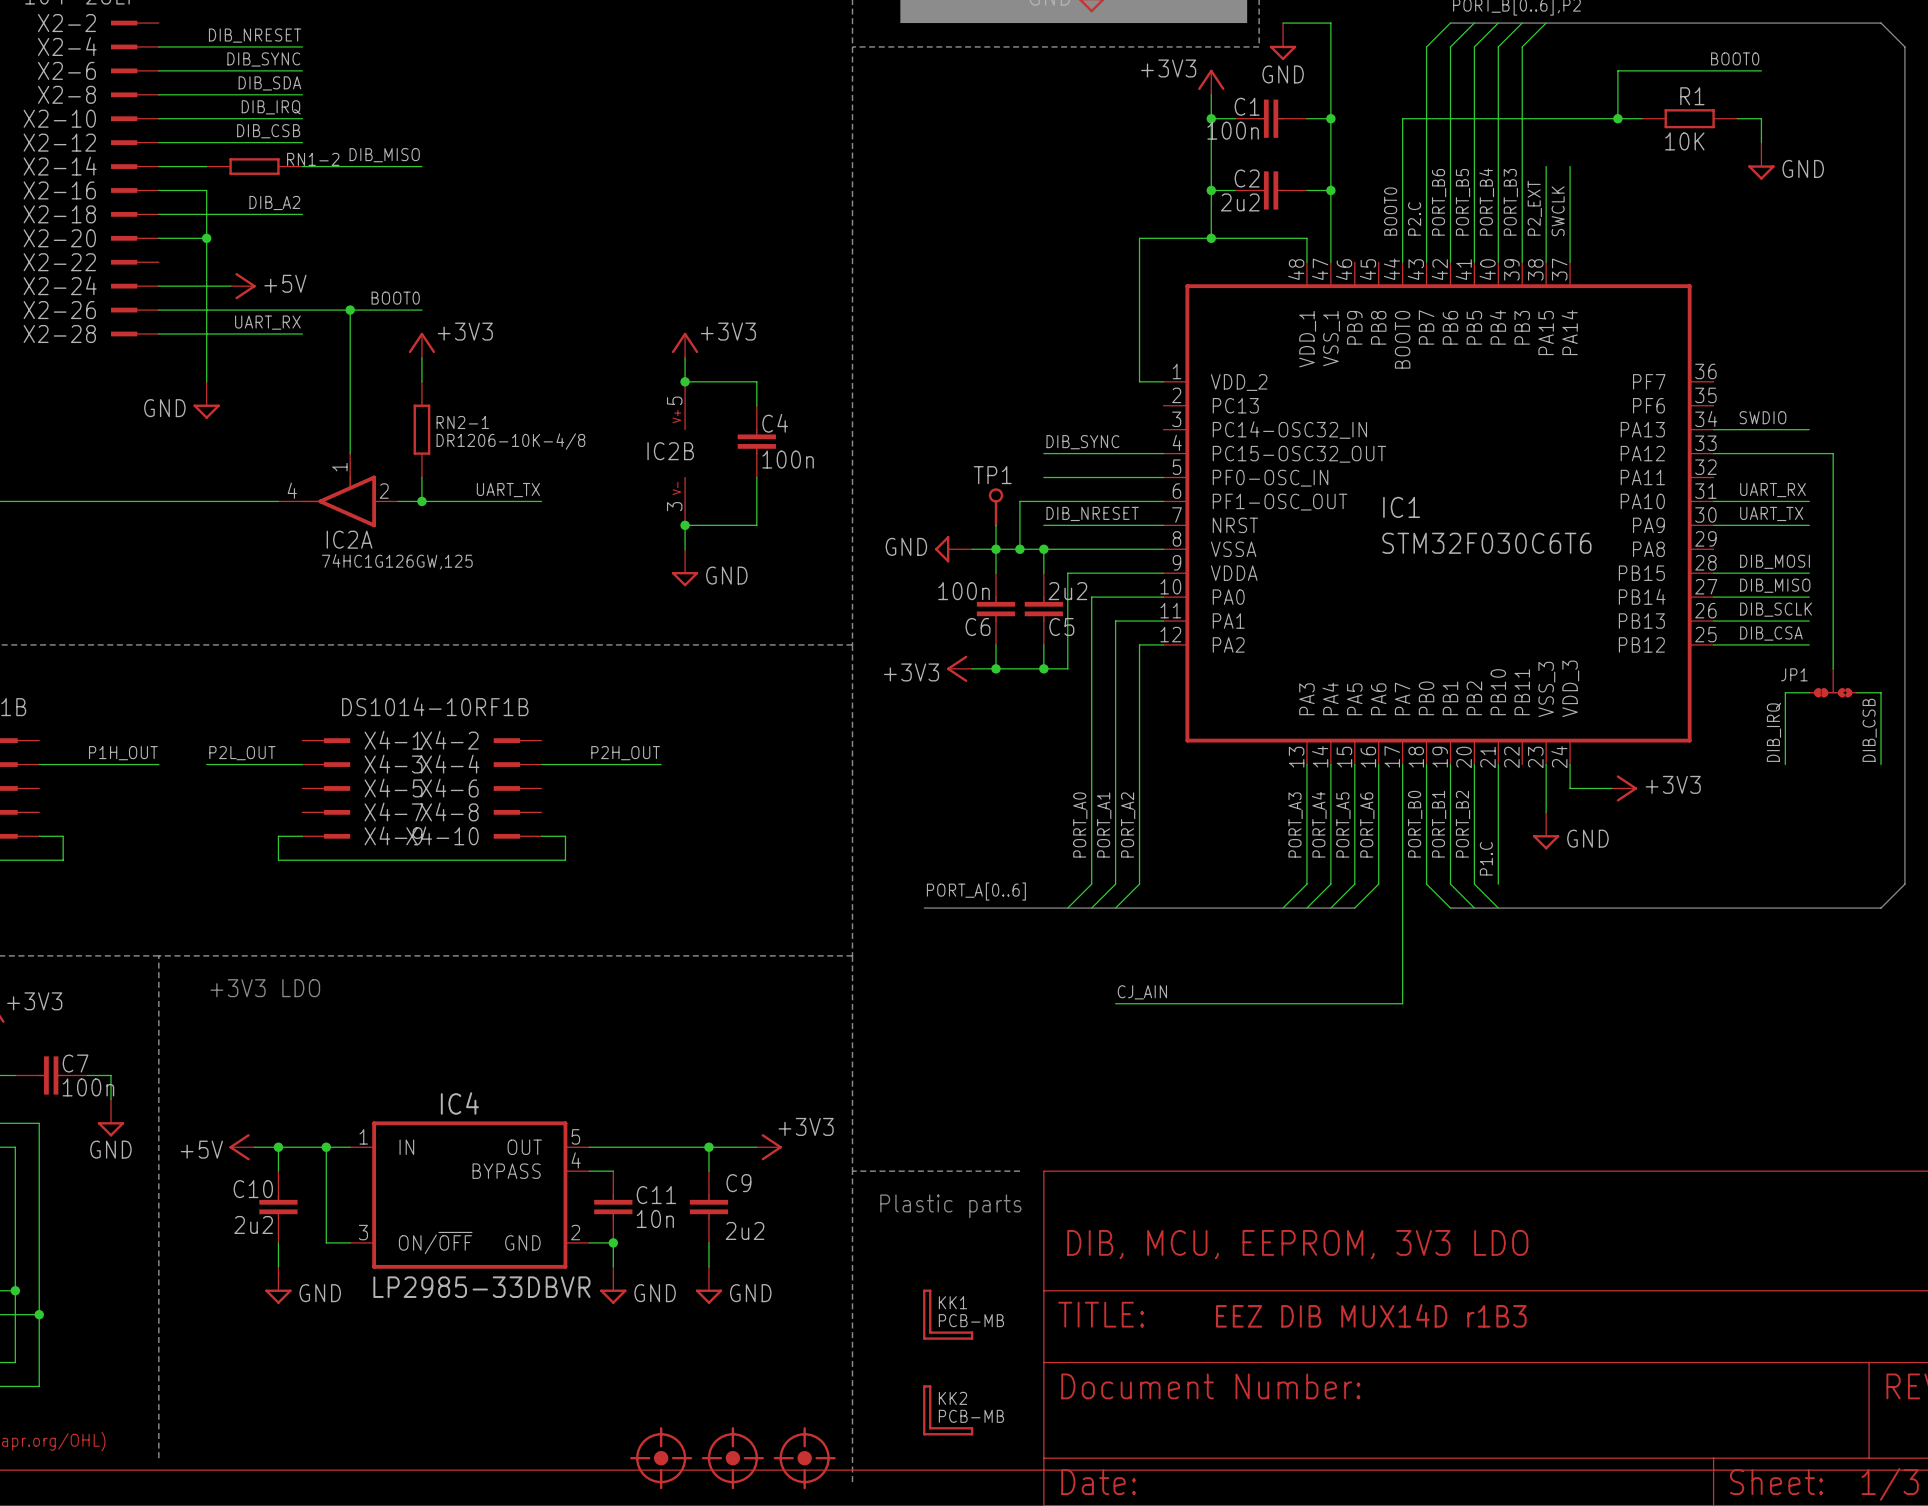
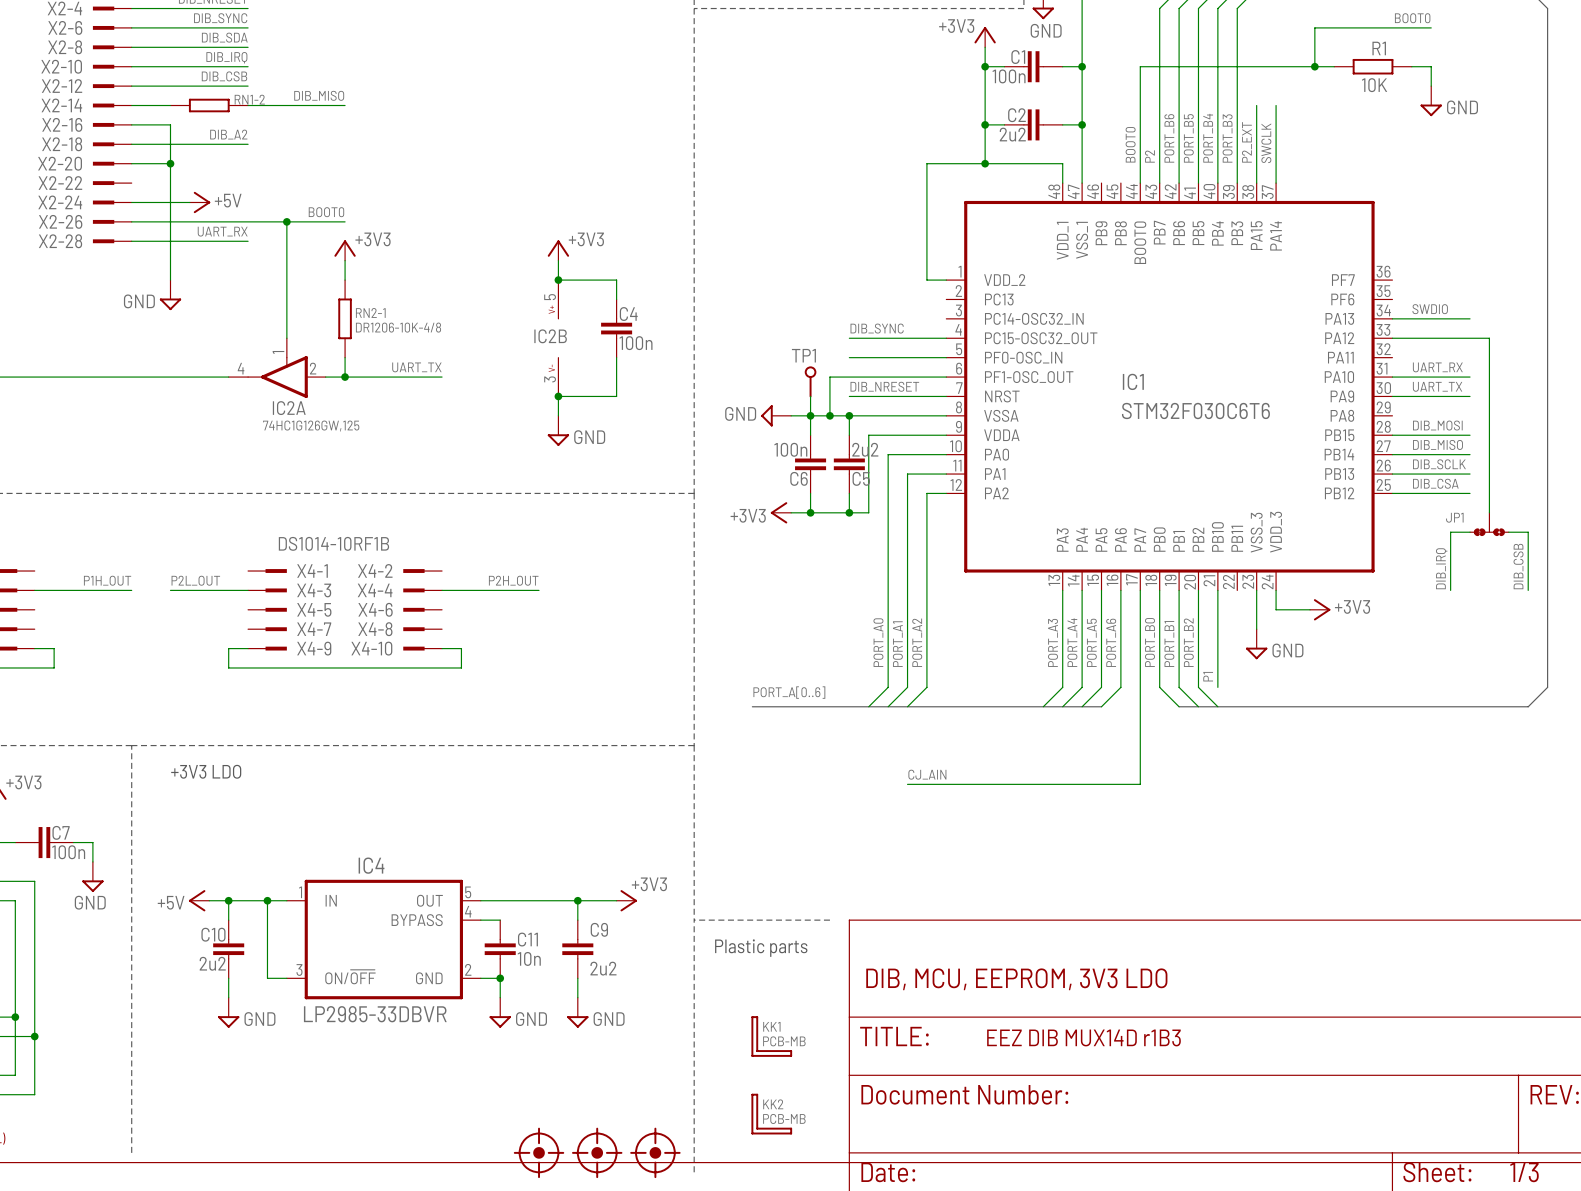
label: P2.C (1414, 218) -> P2 (1149, 156)
label: P1.C (1486, 858) -> P1 (1208, 676)

